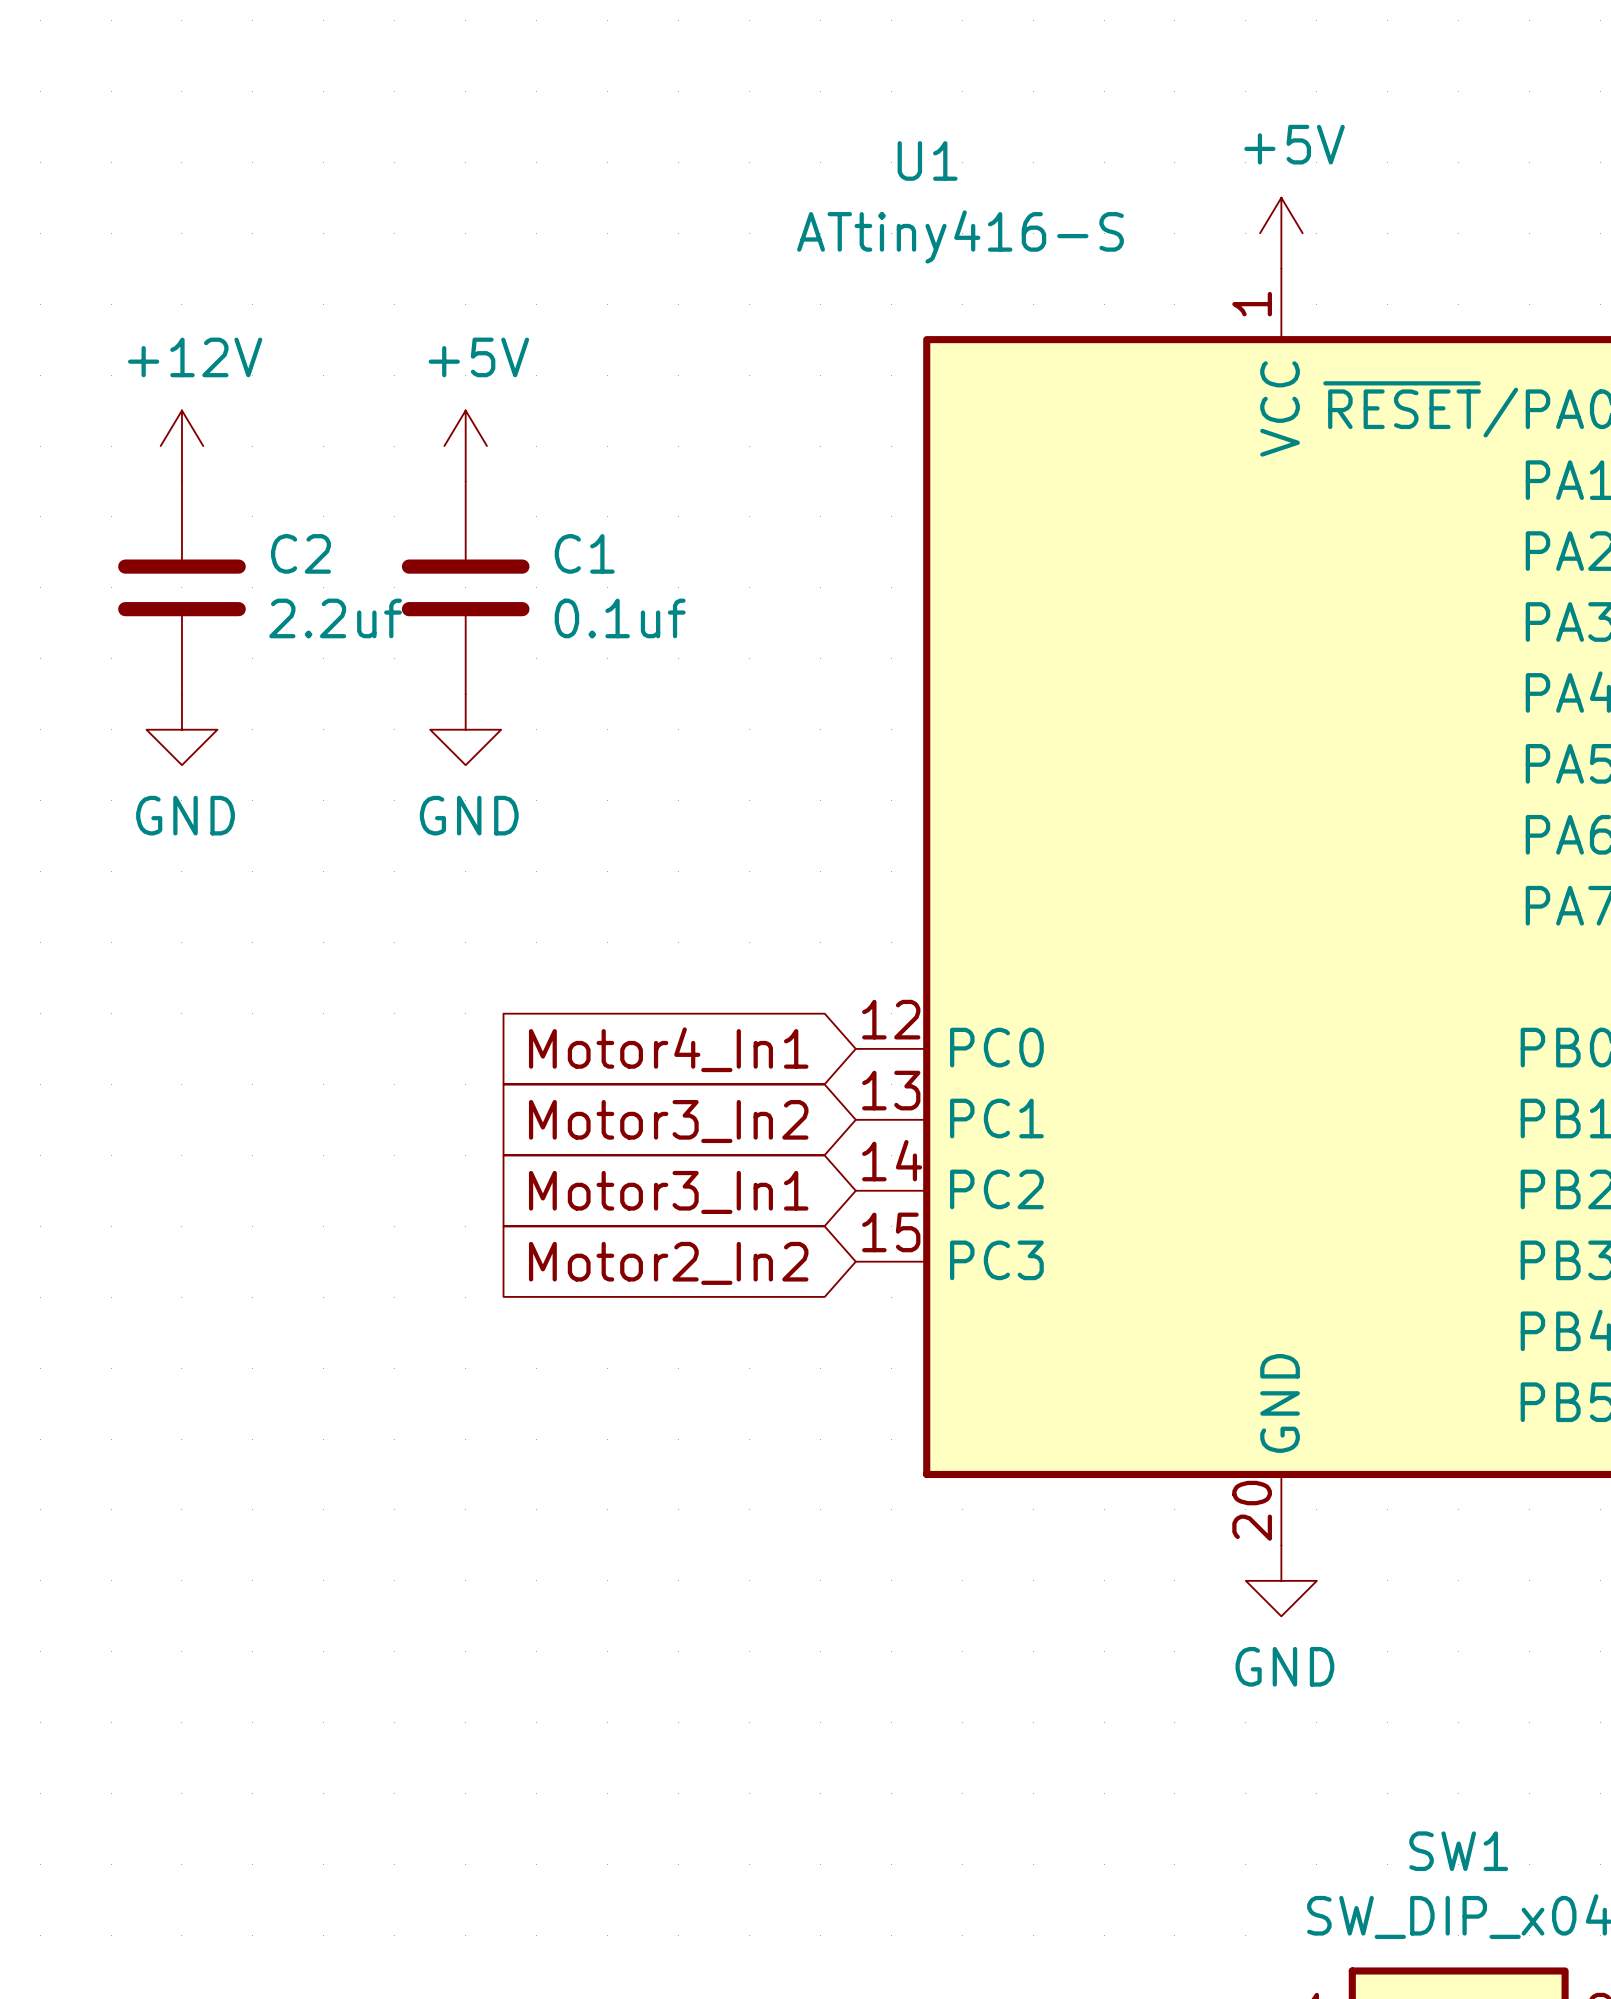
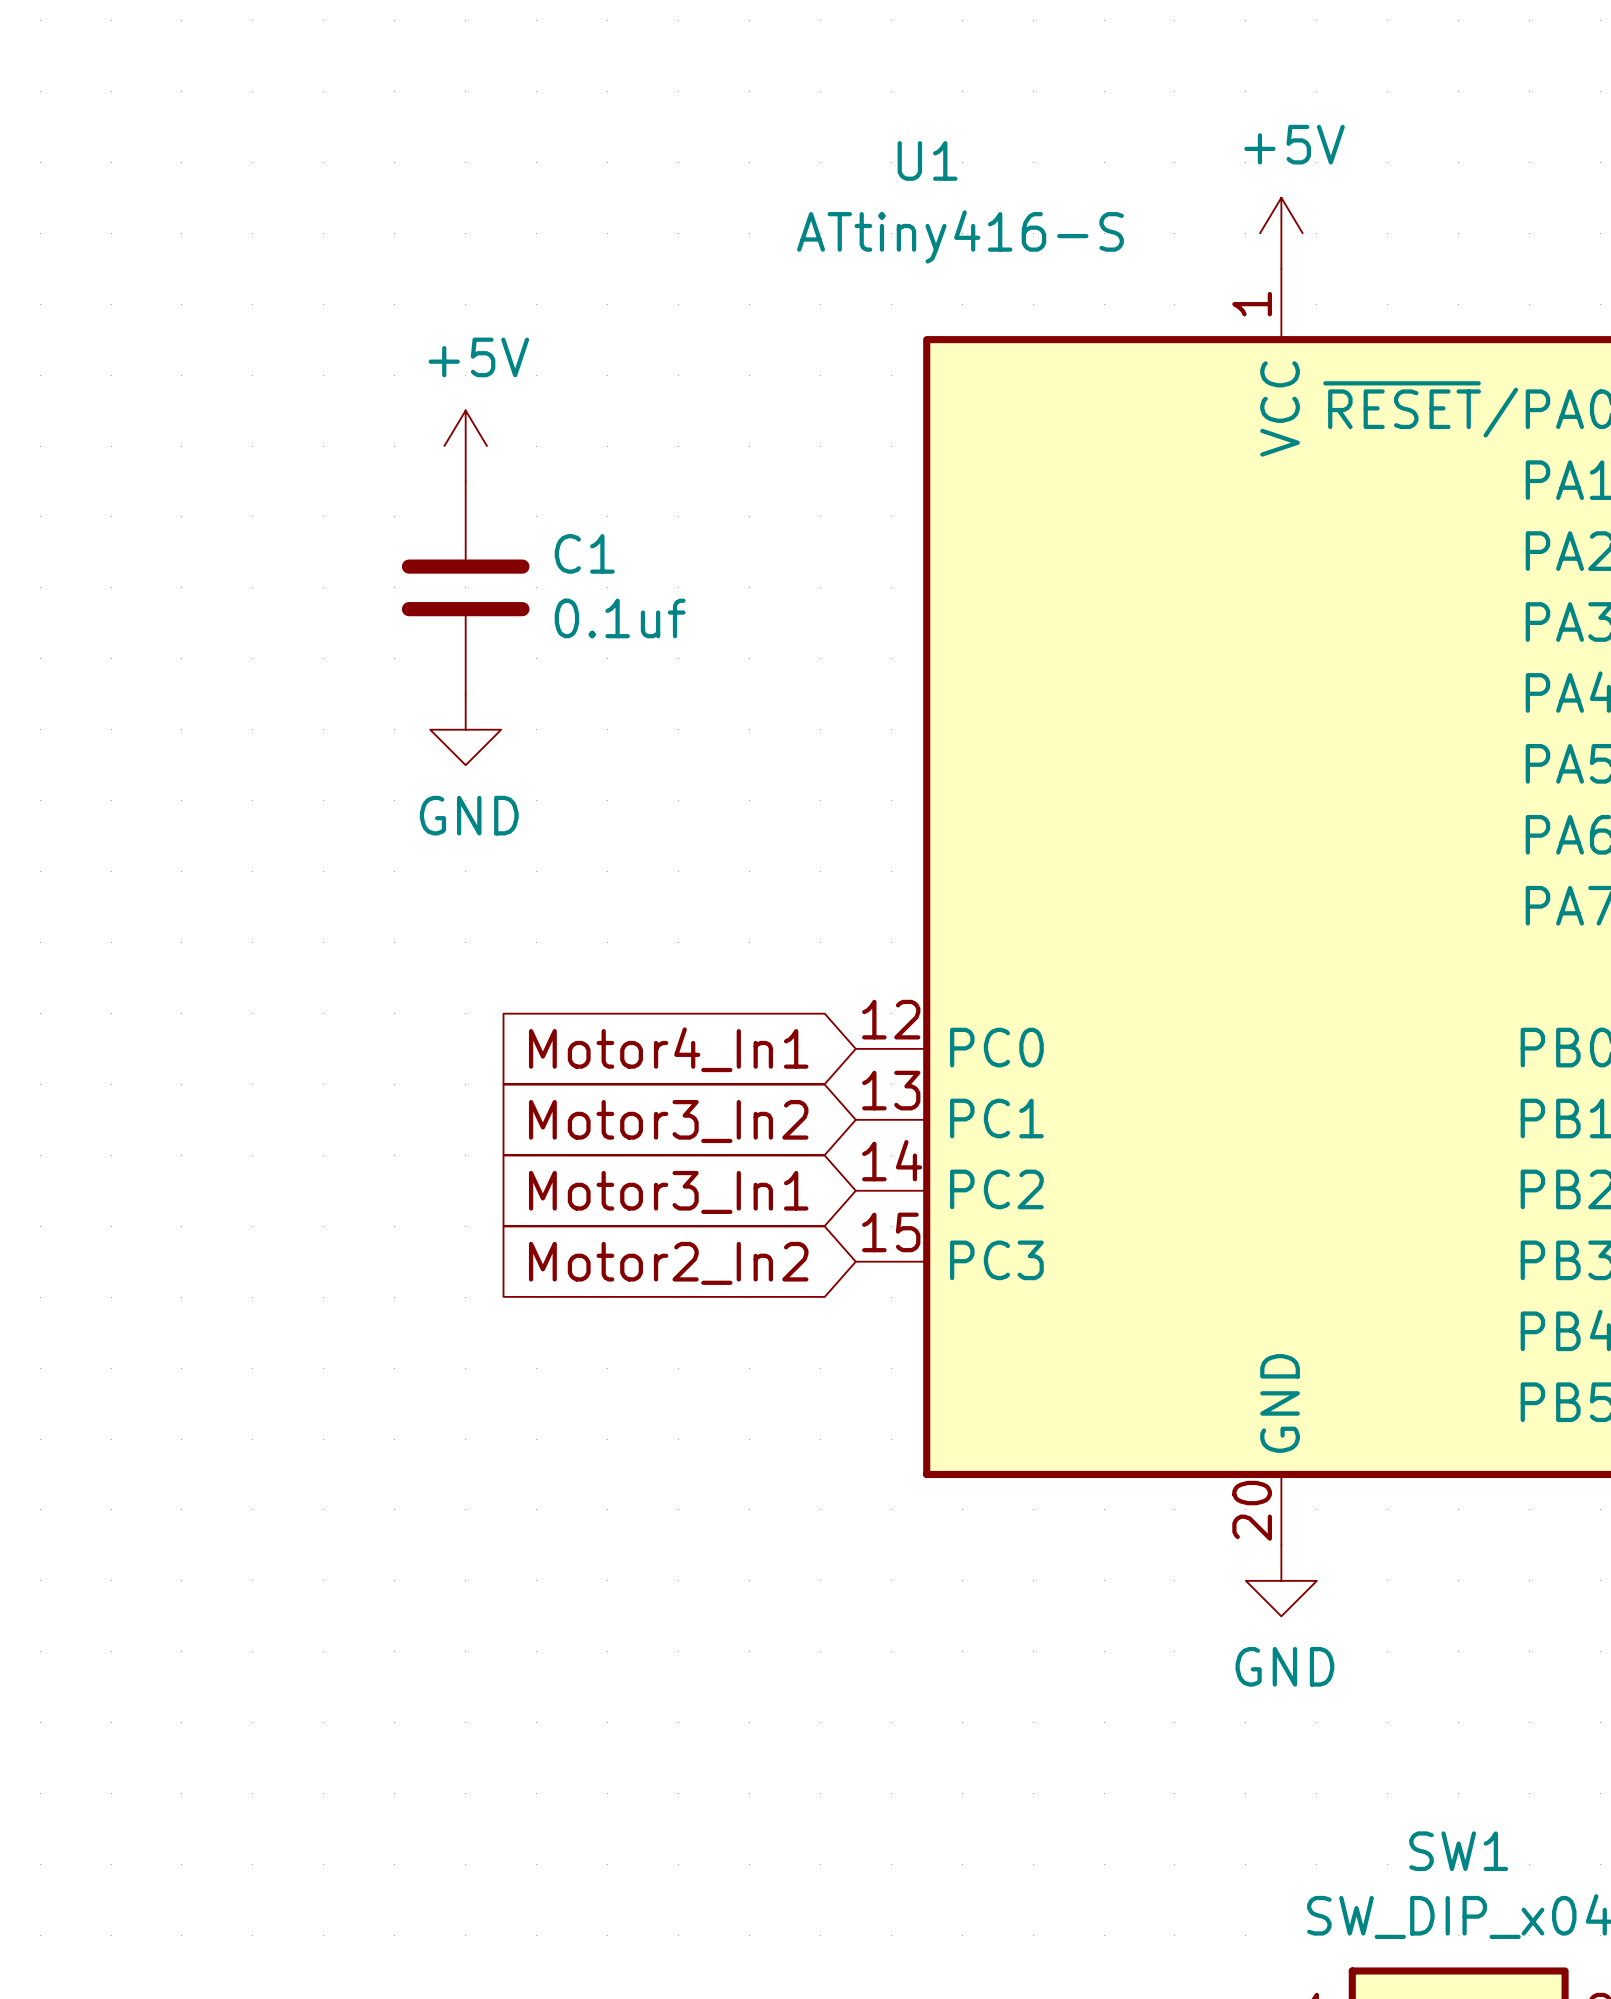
power symbol: +12V (181, 446) -> none
C2: 2.2uf (181, 587) -> none
power symbol: GND (181, 729) -> none

